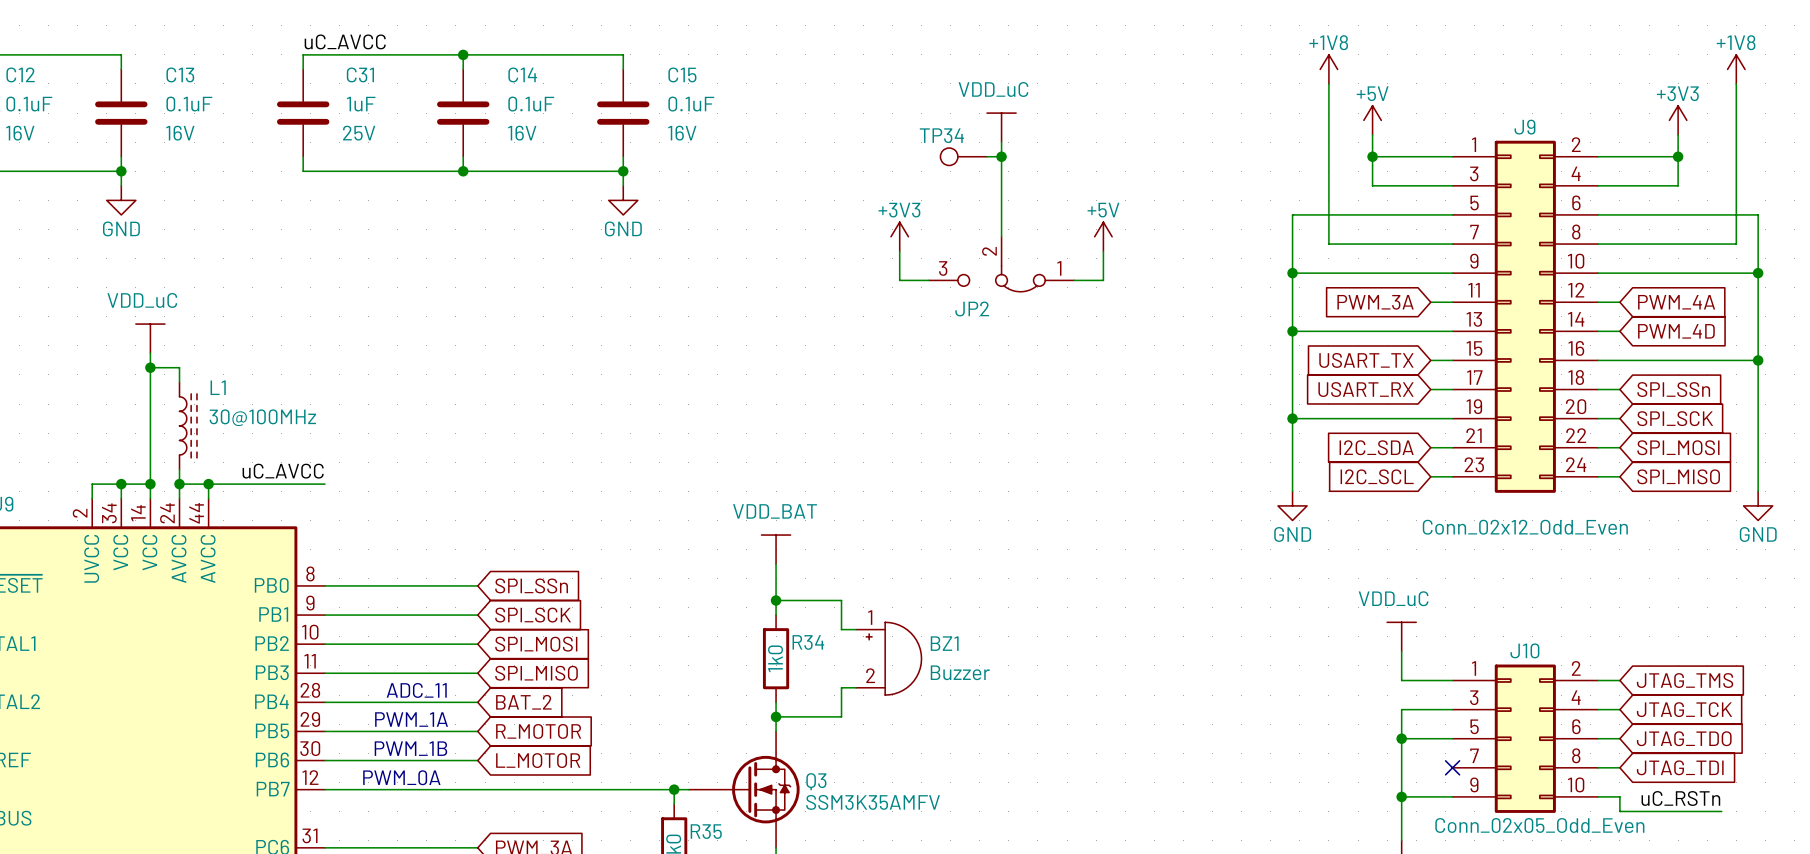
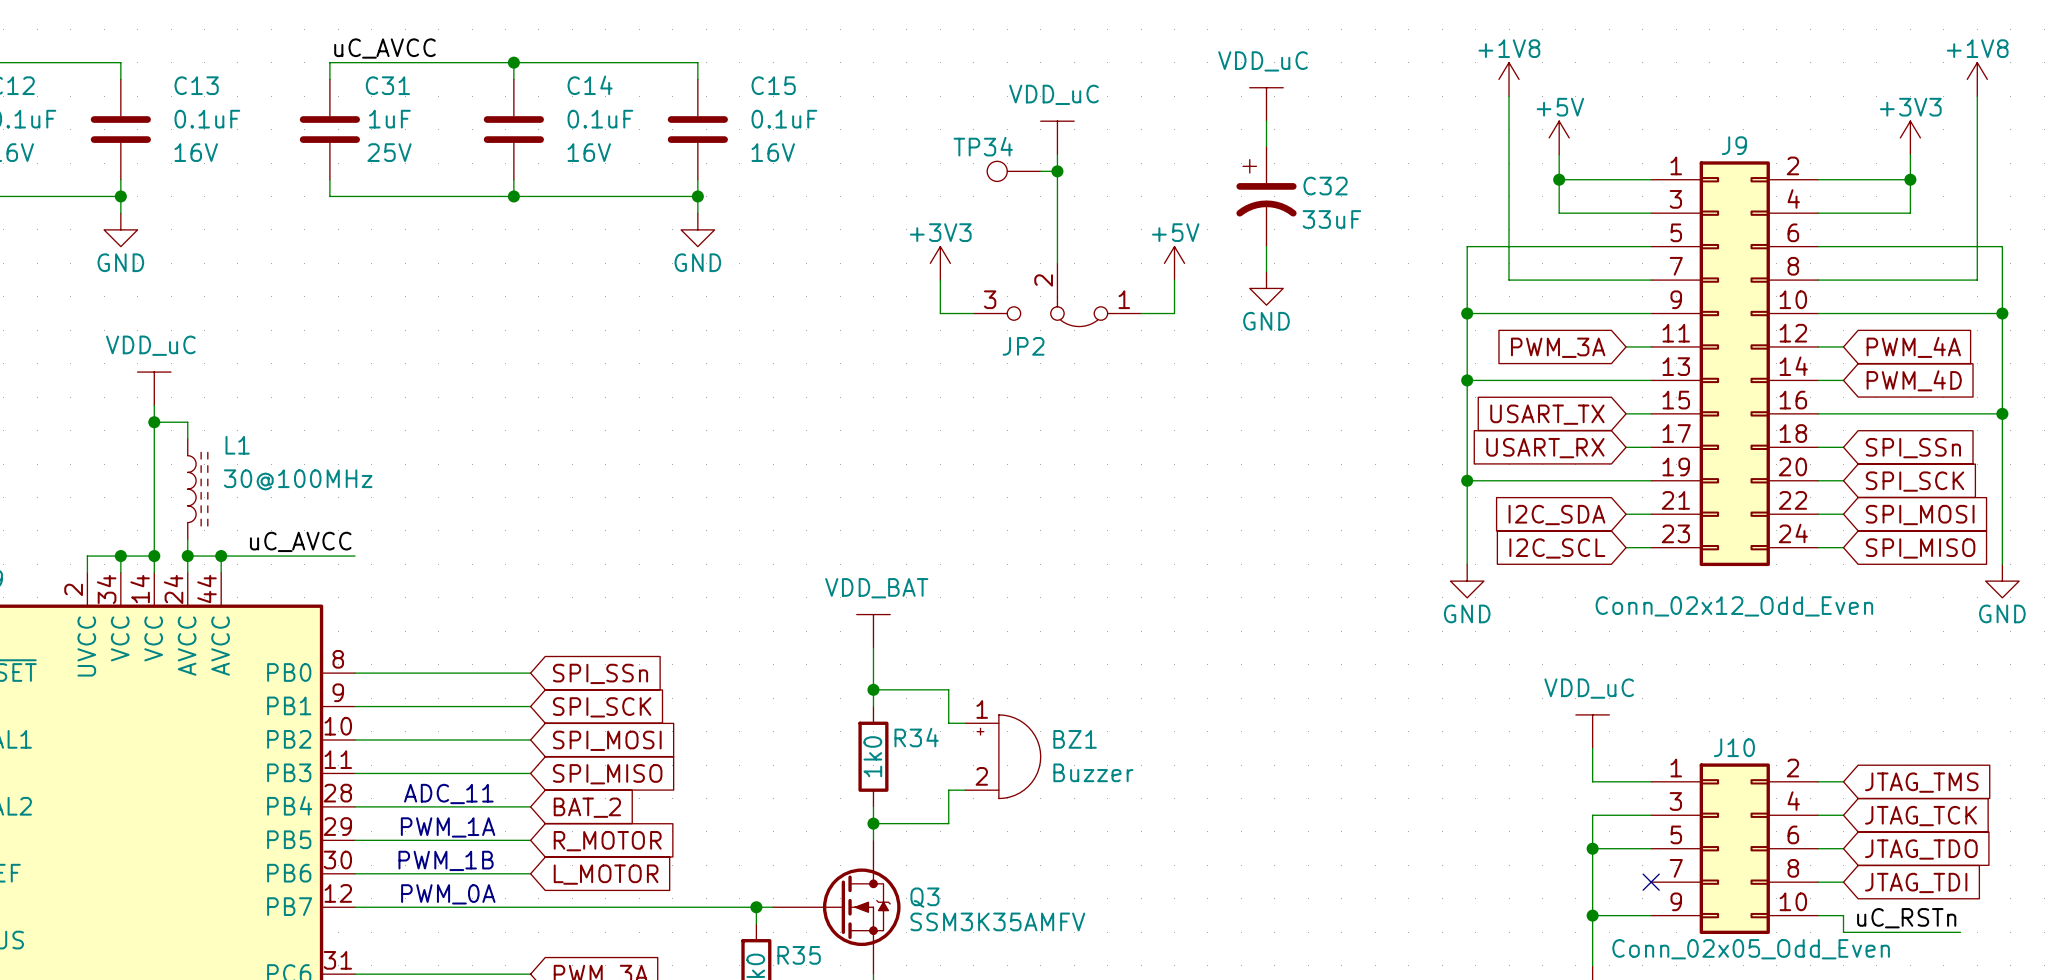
power symbol: none -> VDD_uC (1266, 104)
wire: none -> (1266, 121) (1266, 146)
power symbol: none -> VDD_uC (1057, 137)
power symbol: VDD_uC (1001, 127) -> none
wire: (1001, 142) (1001, 236) -> (1057, 154) (1057, 263)
TP34 position: (963, 156) -> (1013, 171)
wire: (987, 156) (1001, 156) -> (1040, 171) (1057, 171)
junction position: (1001, 156) -> (1057, 171)
C32: none -> (1266, 196)
wire: none -> (1266, 246) (1266, 271)
power symbol position: +3V3 (899, 236) -> +3V3 (940, 263)
power symbol position: +5V (1103, 236) -> +5V (1174, 263)
wire: (899, 251) (899, 280) (928, 280) -> (940, 280) (940, 313) (973, 313)
wire: (1103, 251) (1103, 280) (1074, 280) -> (1174, 280) (1174, 313) (1141, 313)
power symbol: none -> GND (1266, 288)
JP2 position: (1001, 264) -> (1057, 294)

